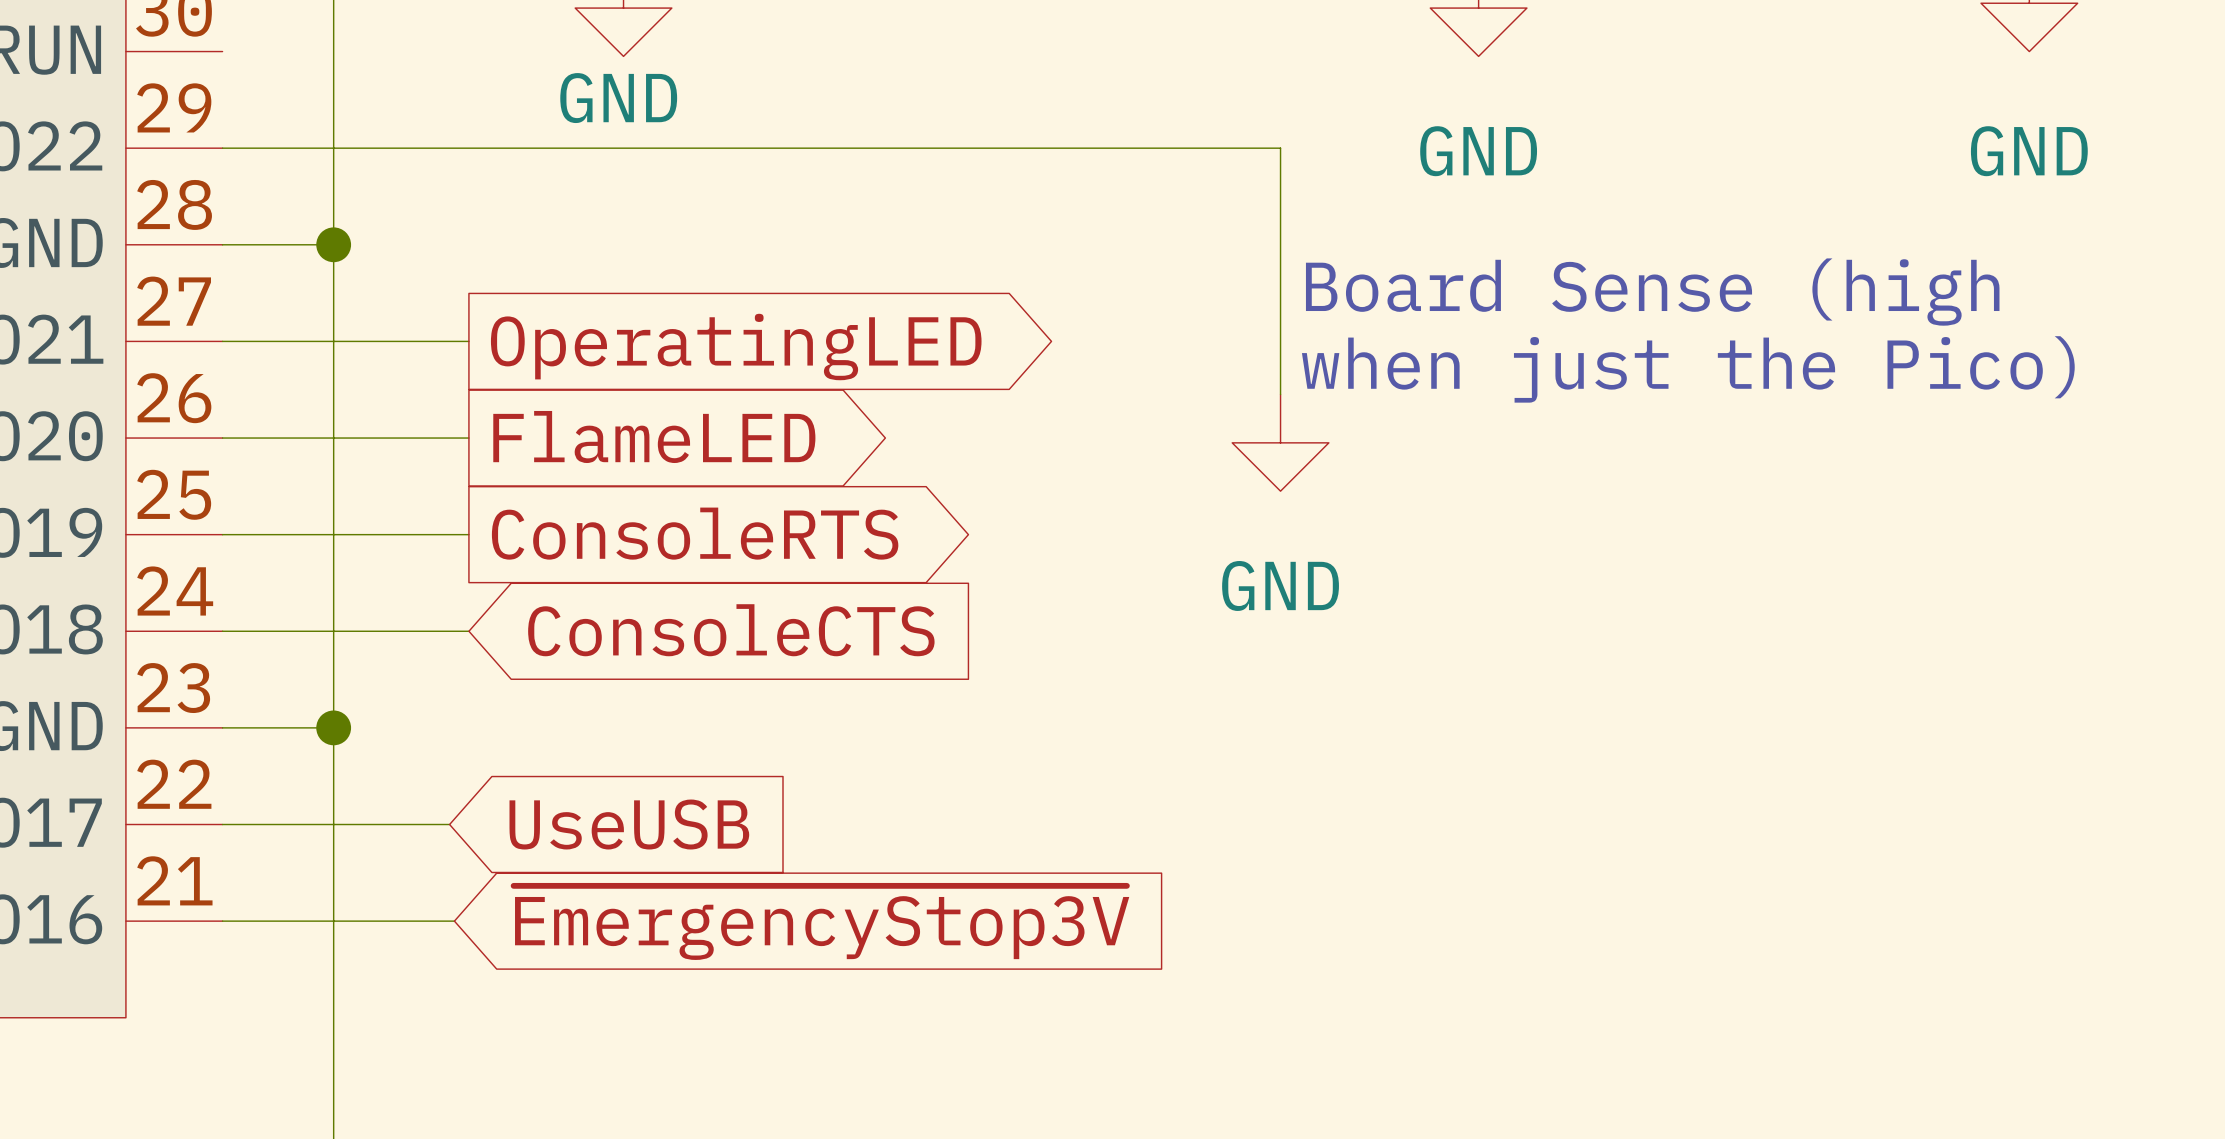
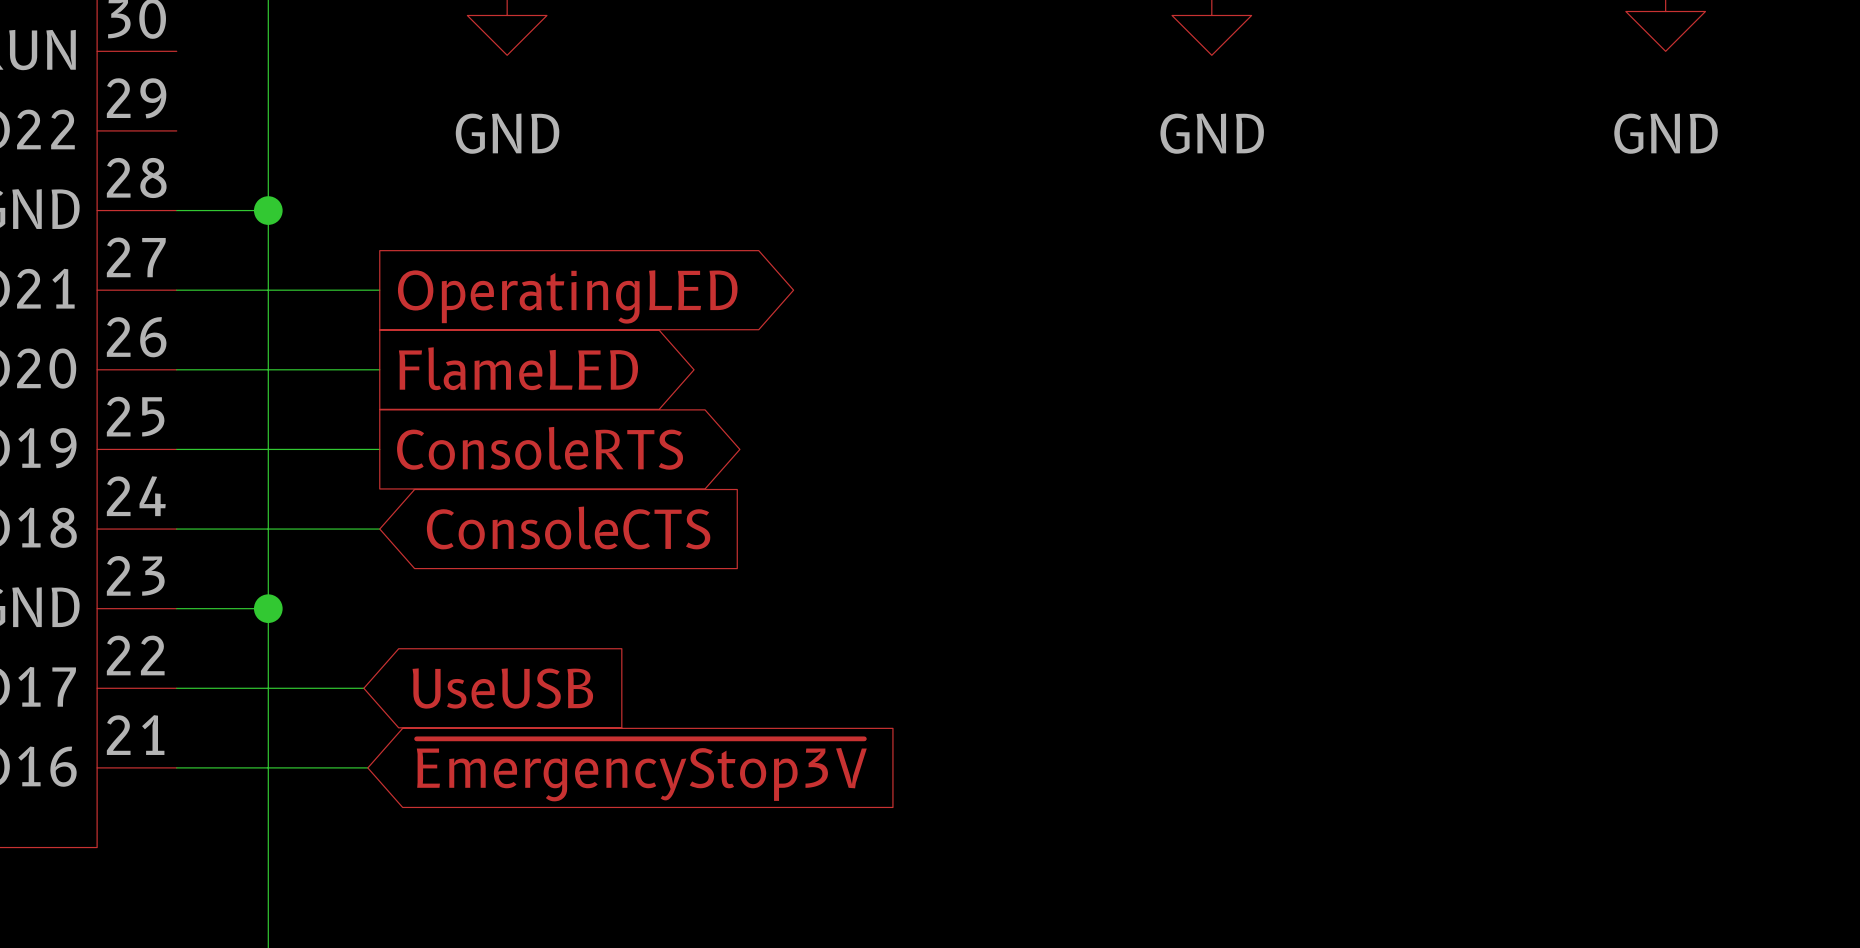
power symbol text position: GND (618, 98) -> GND (507, 133)
wire: (222, 148) (1280, 148) (1280, 394) -> none
text: Board Sense (high (1652, 292) -> none
text: when just the Pico) (1688, 369) -> none
power symbol: GND (1280, 442) -> none

